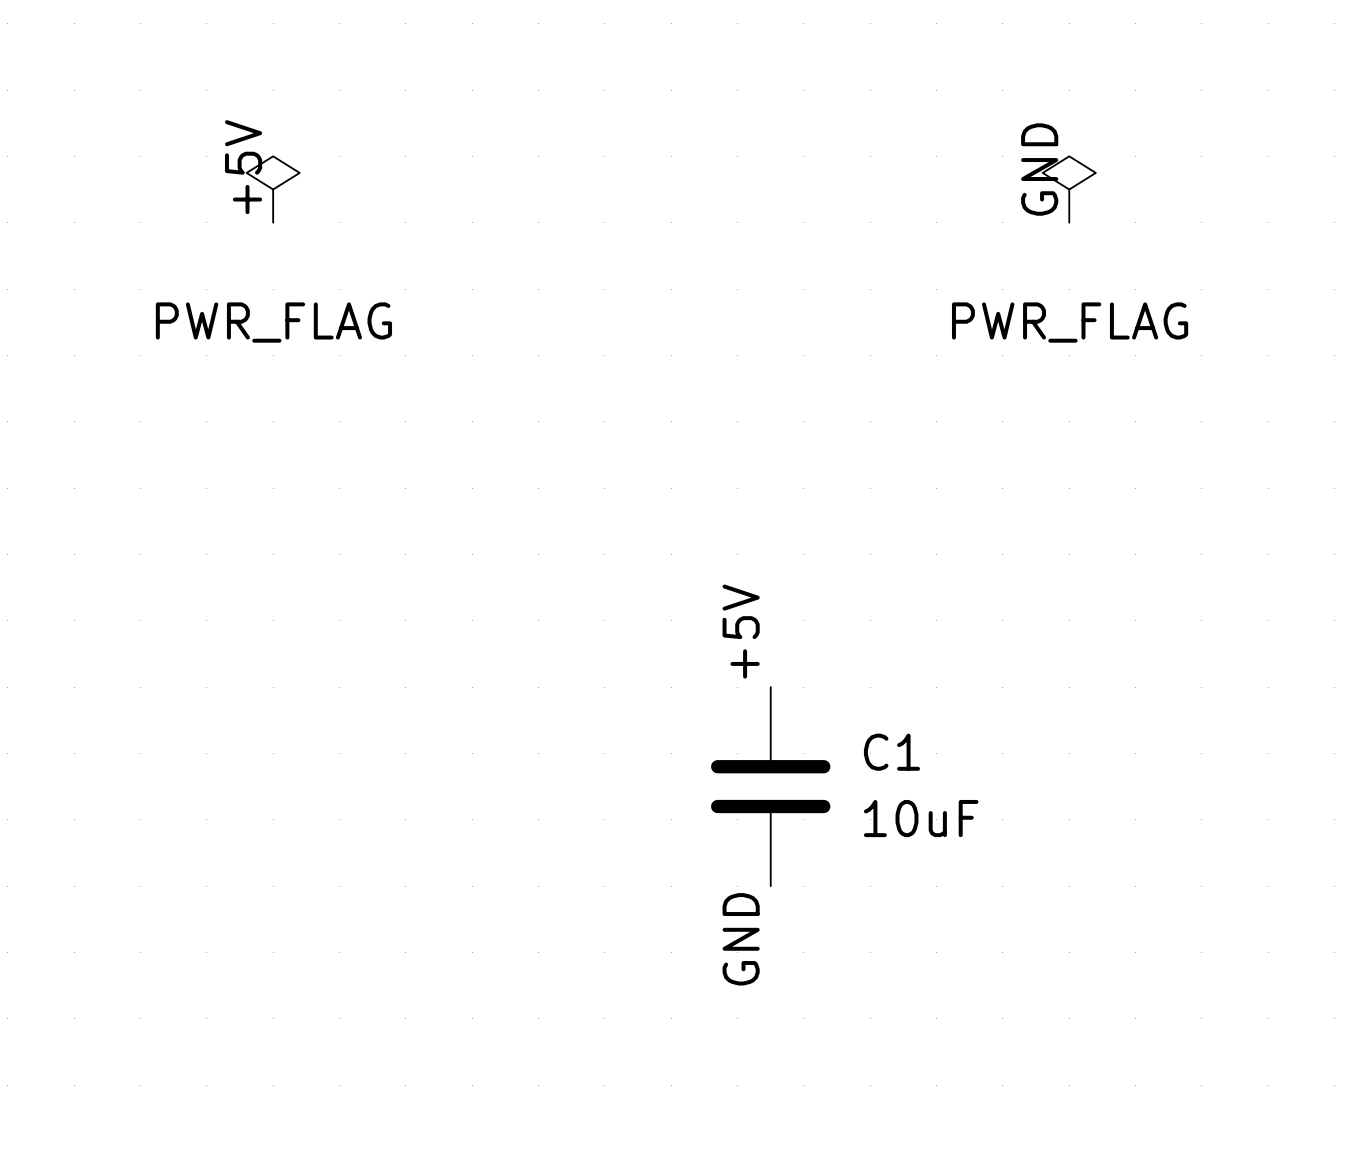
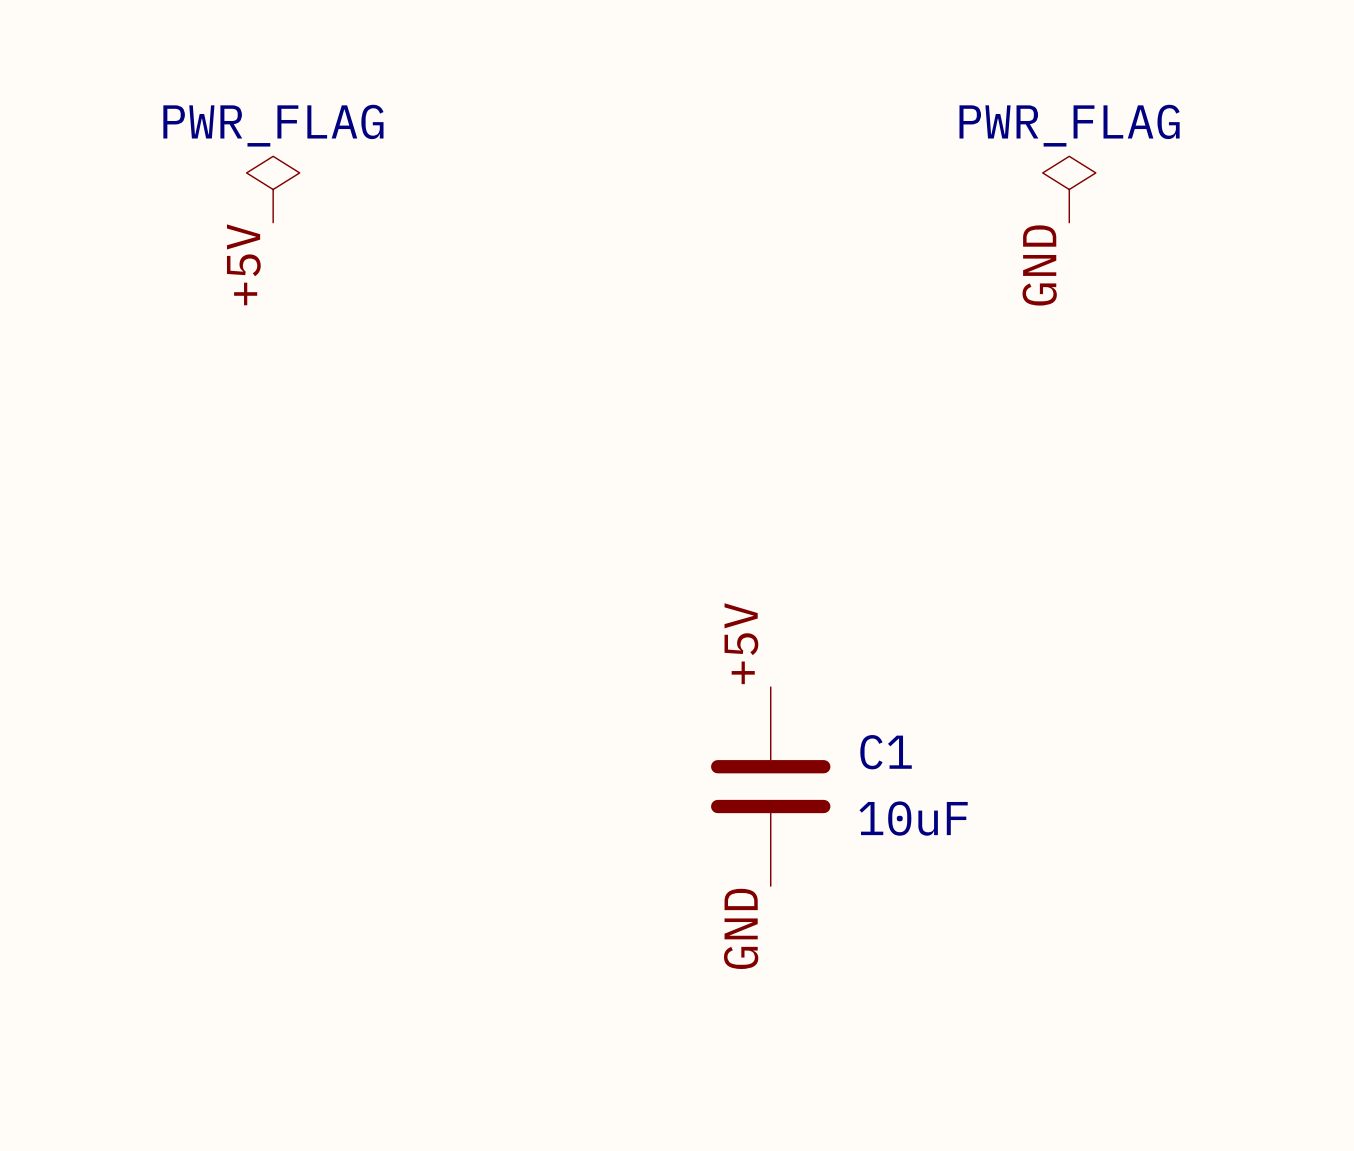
label position: +5V (243, 167) -> +5V (243, 264)
label position: GND (1039, 169) -> GND (1039, 265)
power symbol text position: PWR_FLAG (273, 322) -> PWR_FLAG (273, 125)
power symbol text position: PWR_FLAG (1070, 322) -> PWR_FLAG (1069, 125)

